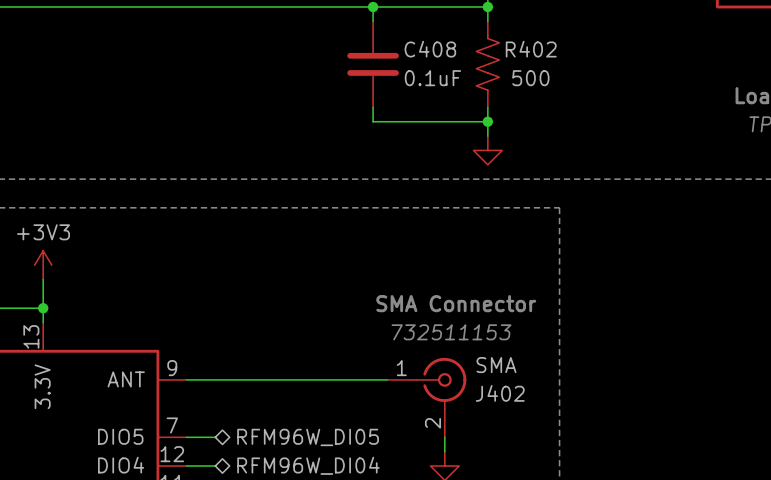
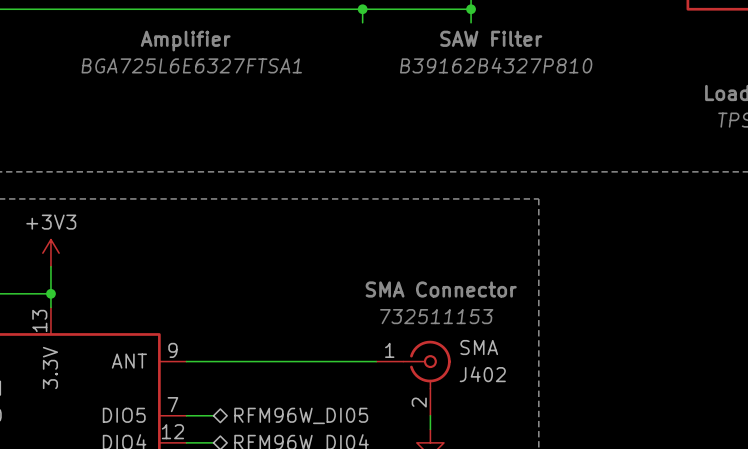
text: none -> SAW Filter (491, 38)
text: none -> Amplifier (185, 41)
C408: 0.1uF (373, 64) -> none
R402: 500 (487, 64) -> none
text: none -> BGA725L6E6327FTSA1 (191, 65)
text: none -> B39162B4327P810 (496, 65)
wire: (373, 107) (373, 121) (487, 121) -> none
wire: (487, 107) (487, 136) -> none
junction: (487, 121) -> none
power symbol: (487, 150) -> none

